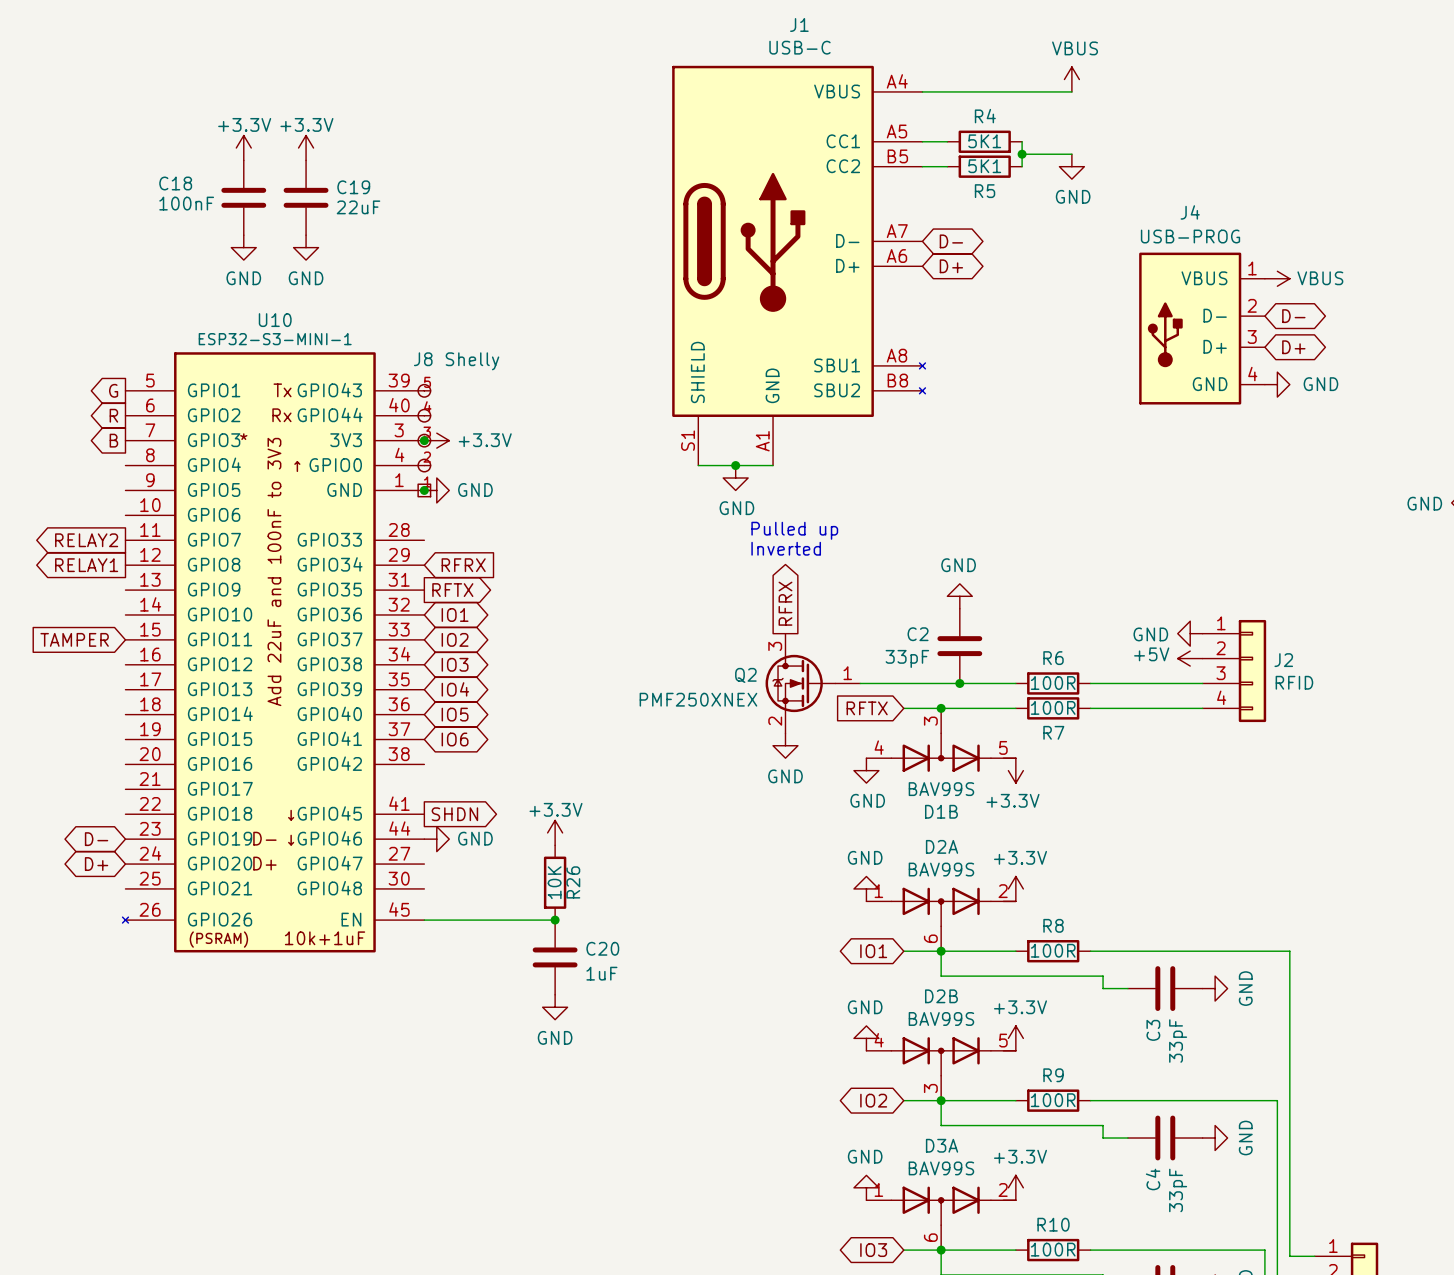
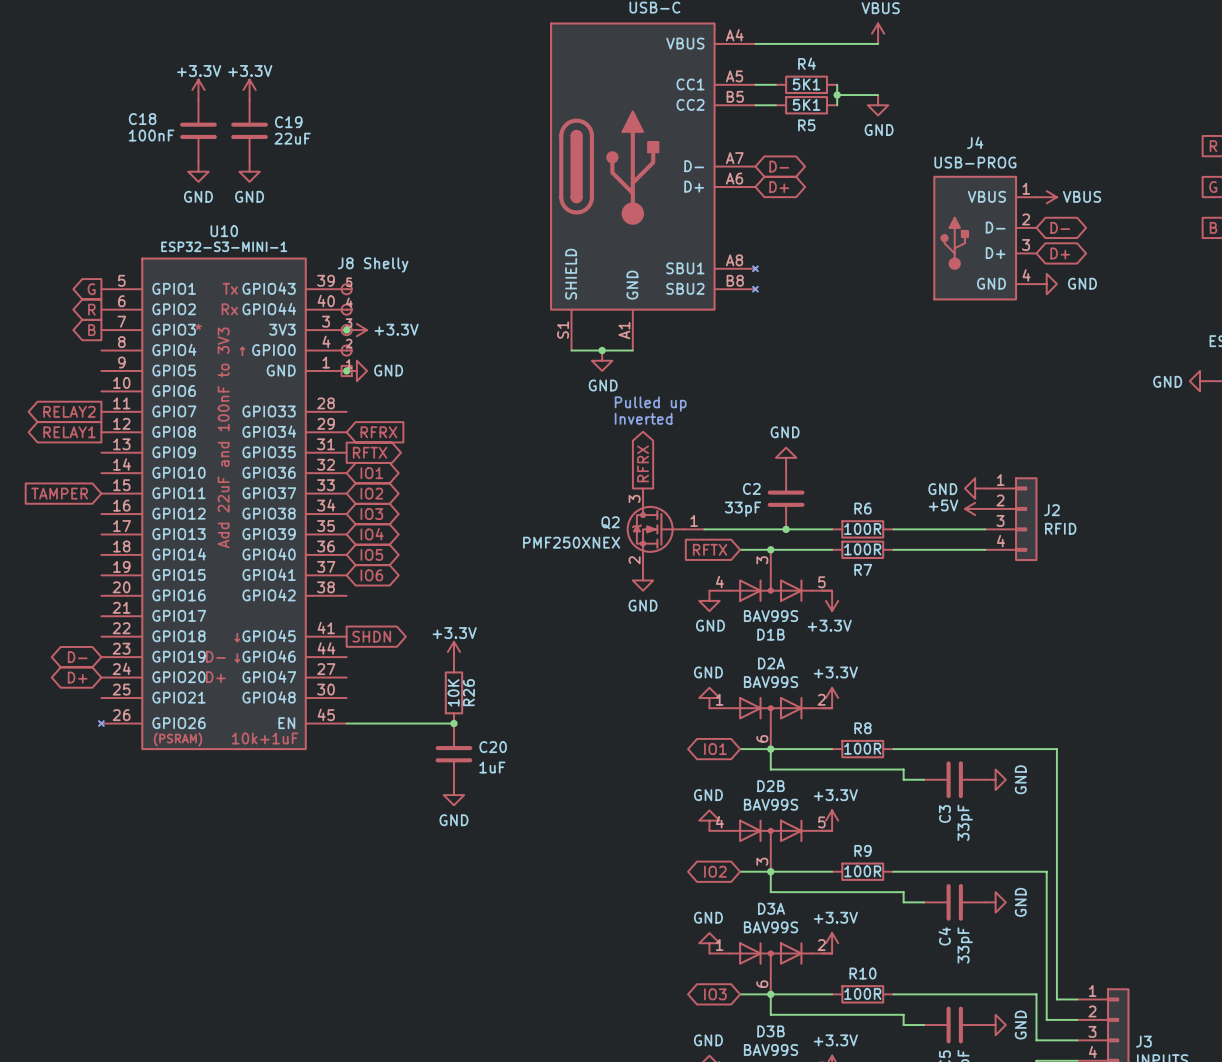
power symbol: GND (436, 839) -> none

